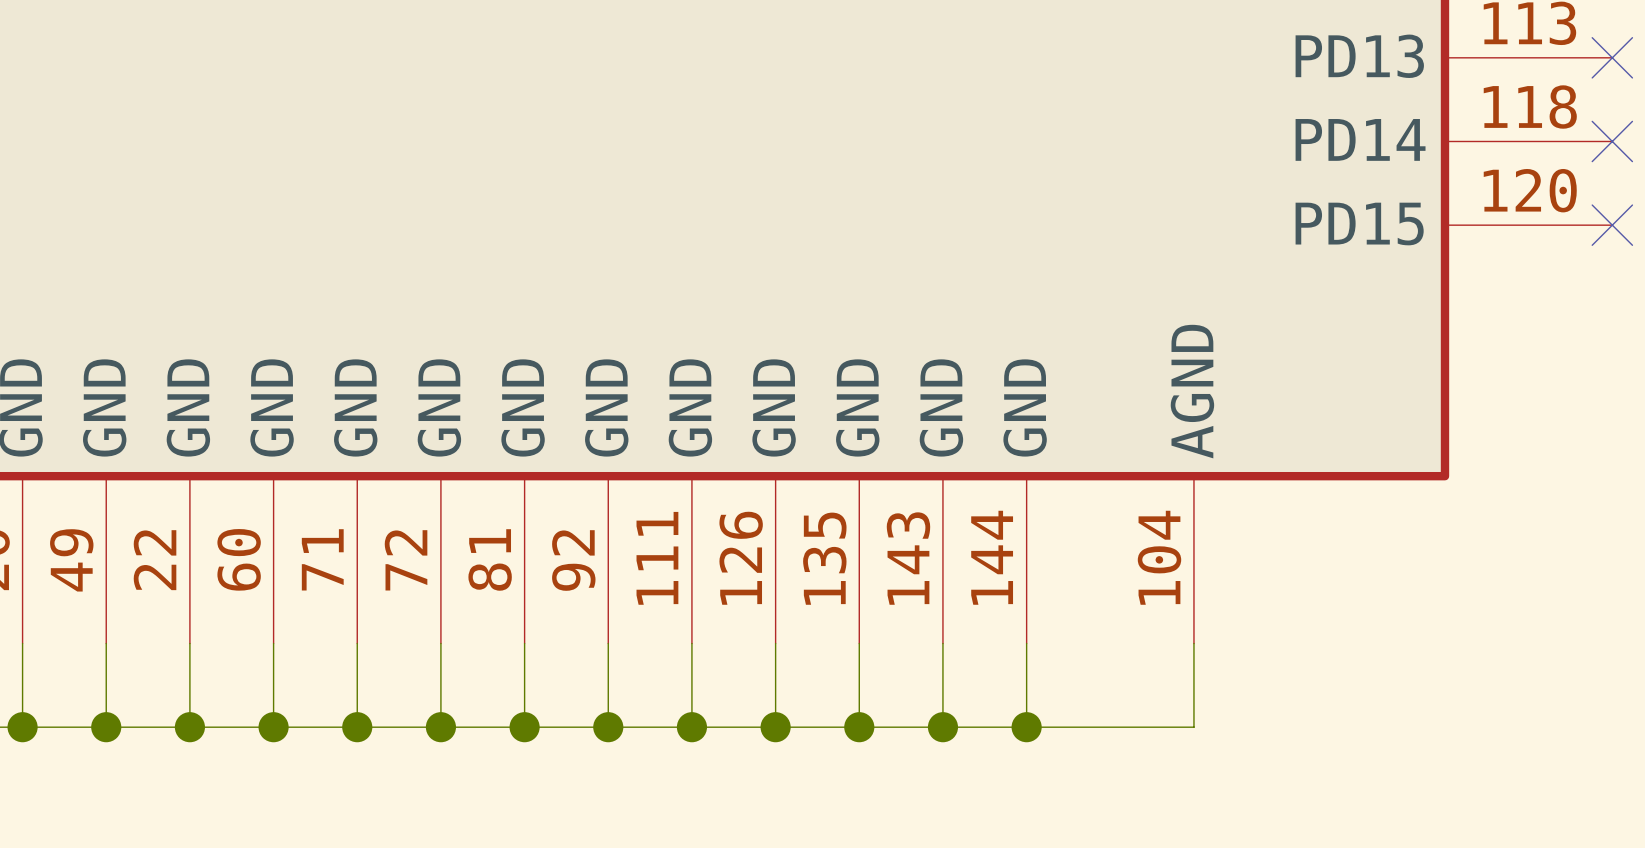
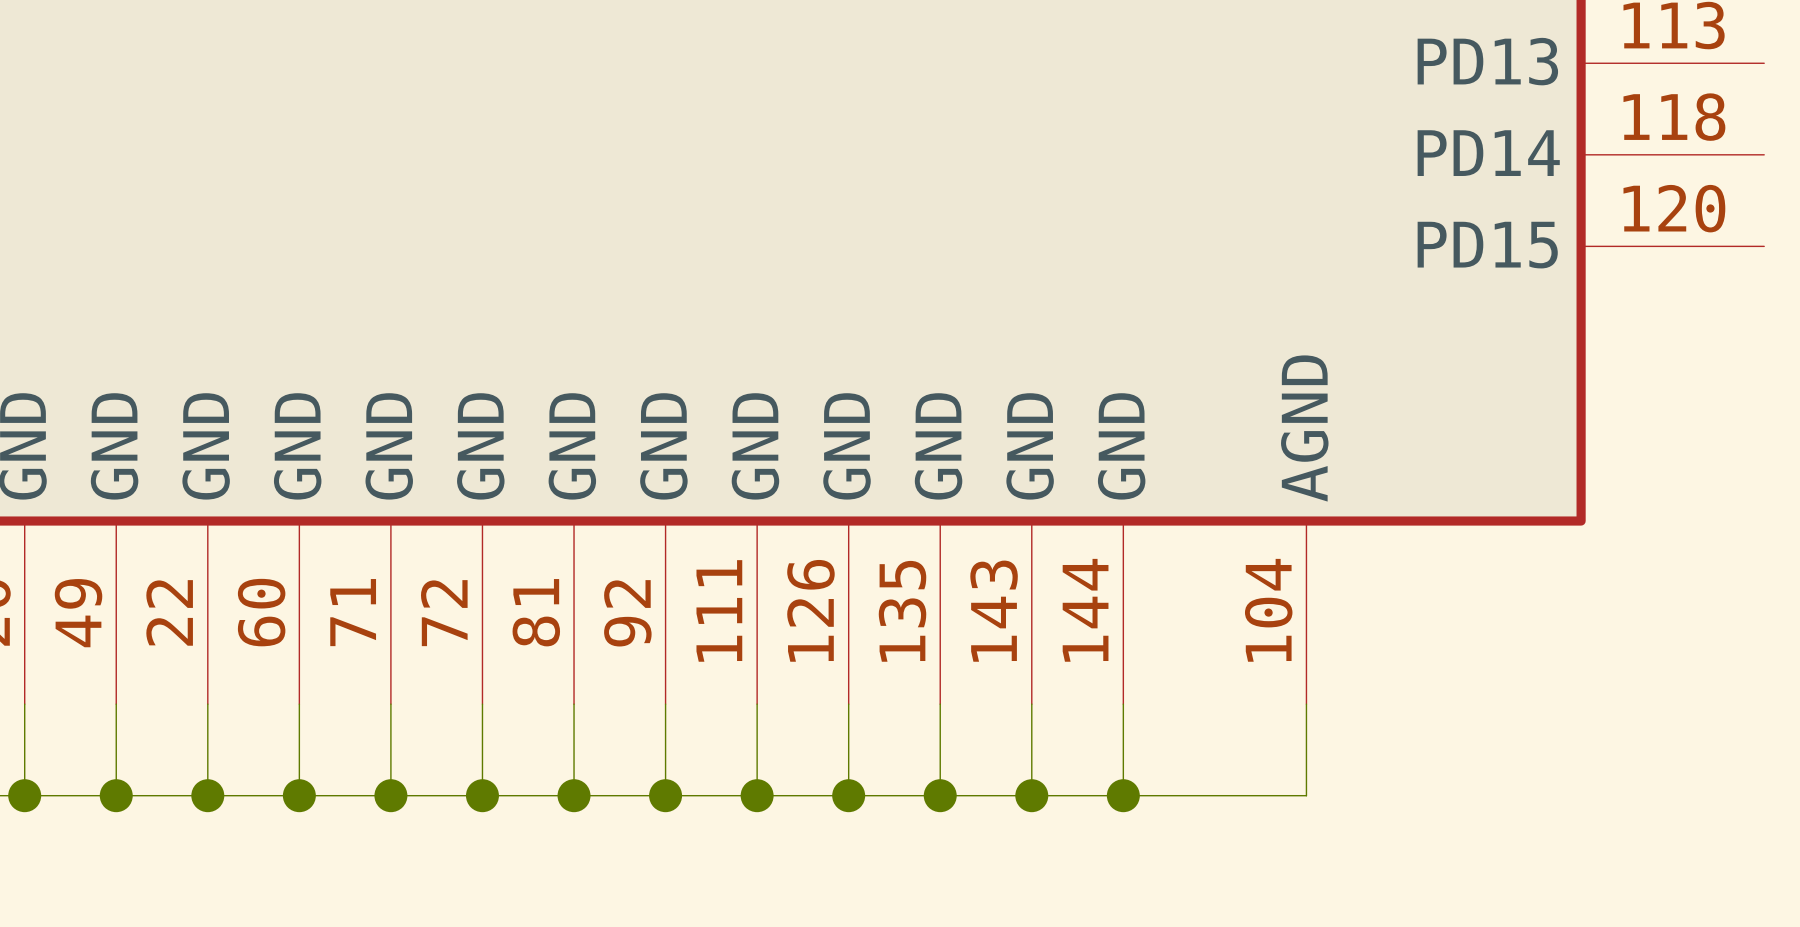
no-connect mark: (1612, 57) -> none
no-connect mark: (1612, 141) -> none
no-connect mark: (1612, 225) -> none

